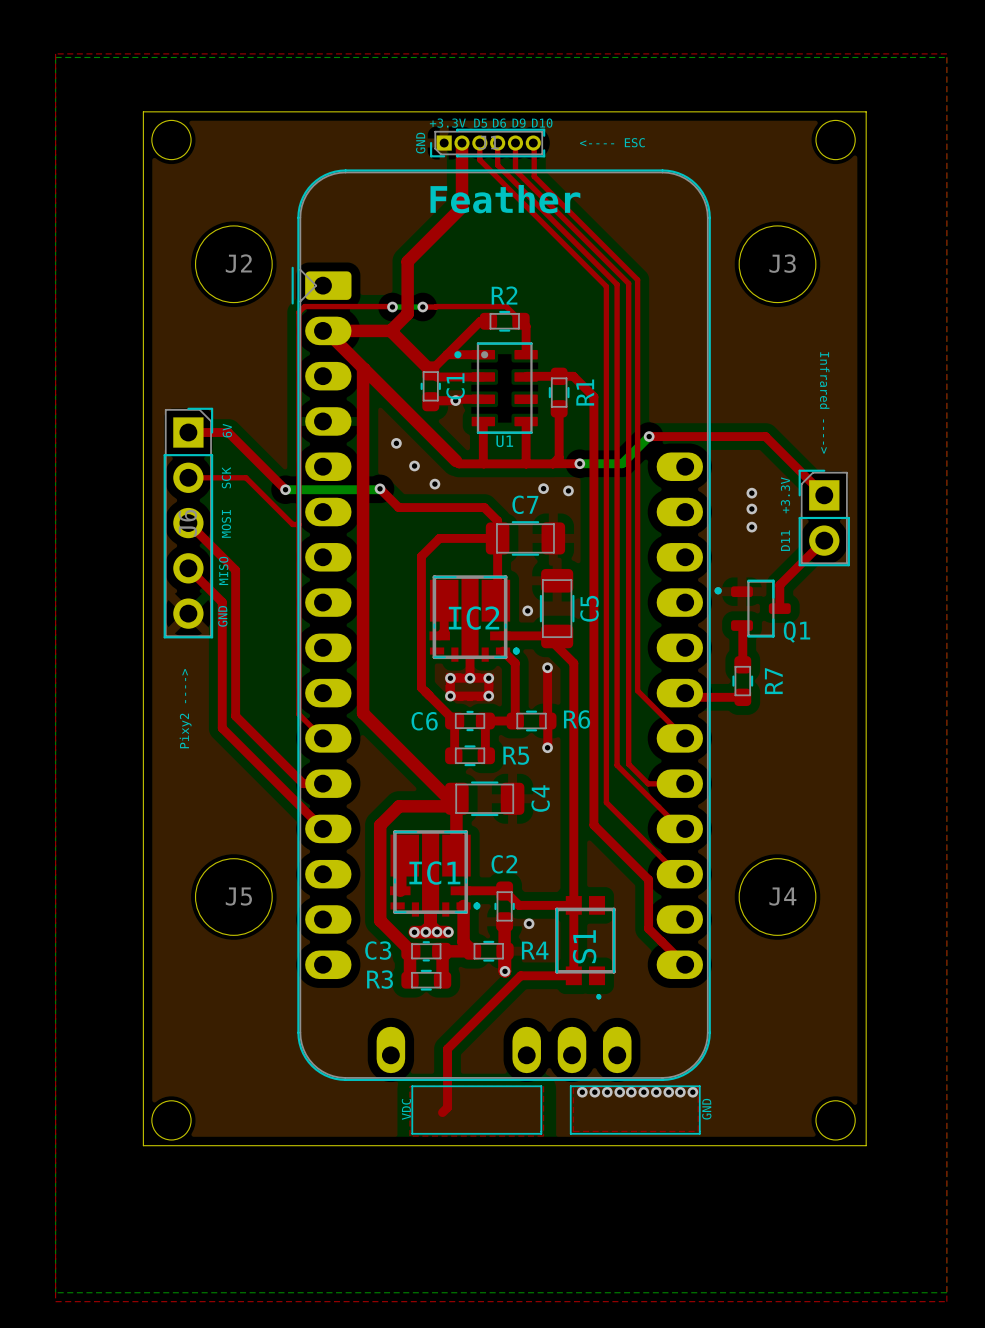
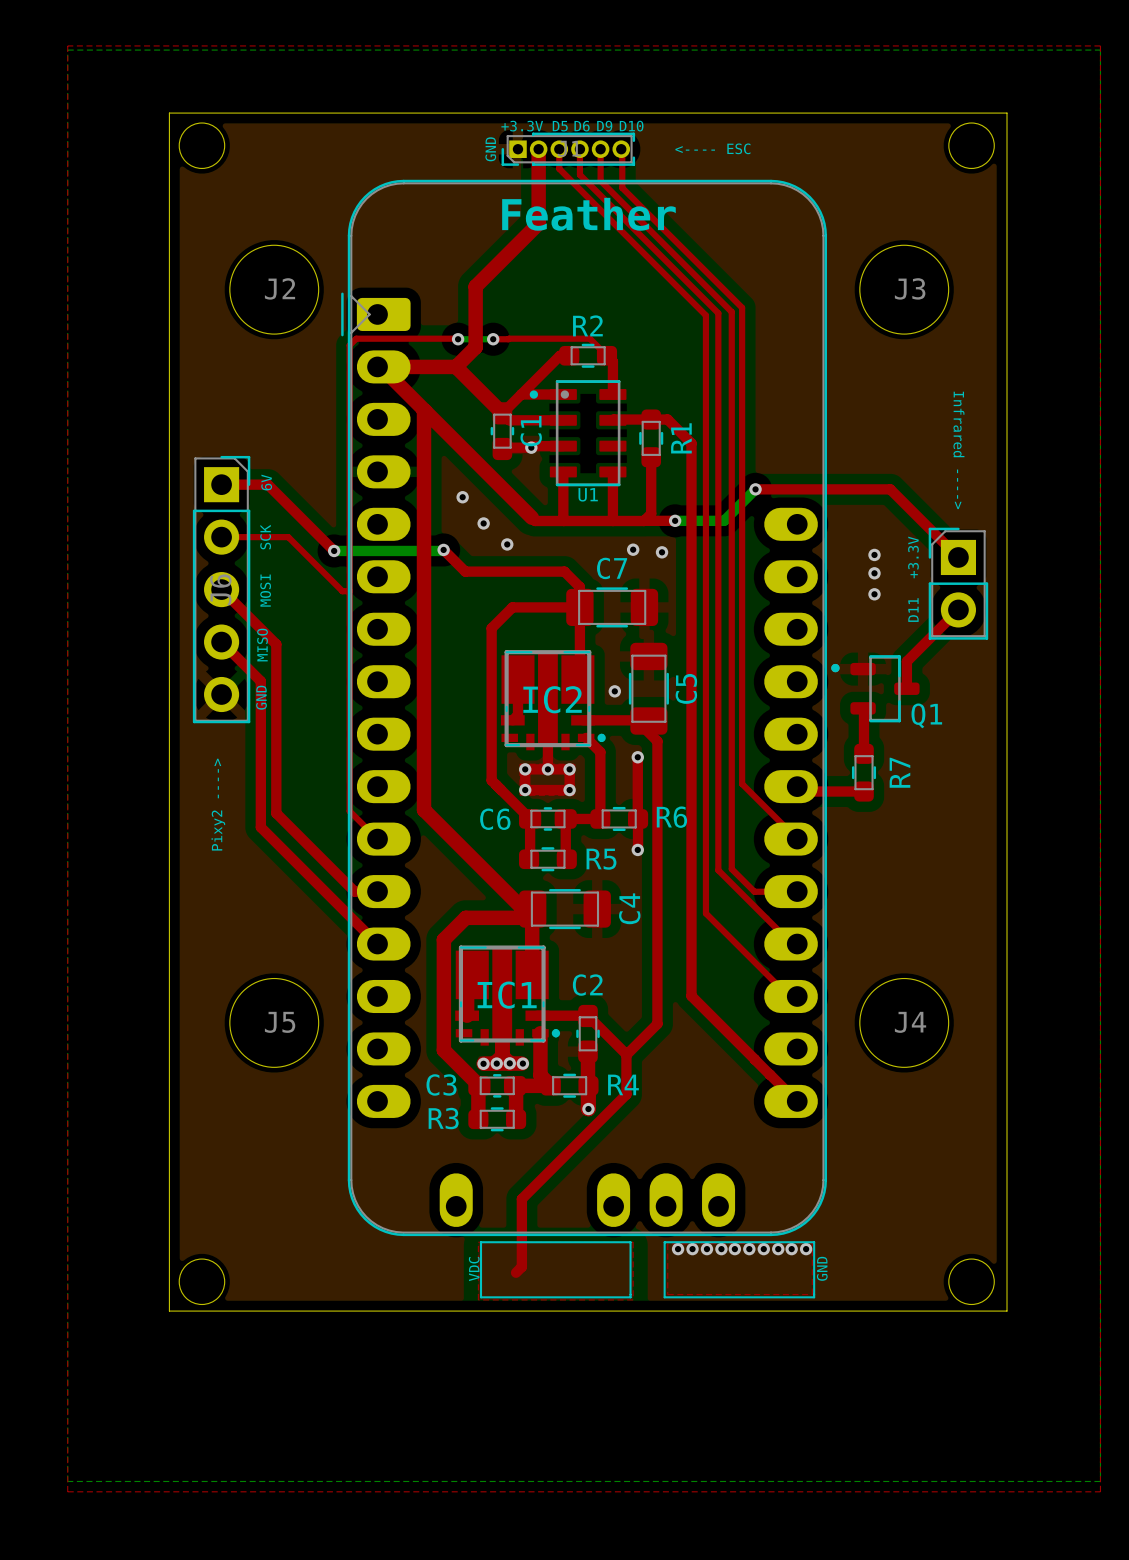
top track: (564, 653) (573, 663) (573, 975) (520, 975) -> (657, 741) (657, 1023) (626, 1054)
top track: (593, 825) (648, 879) (648, 928) -> (691, 939) (691, 996) (754, 1059)
top track: (518, 905) (573, 905) -> (604, 1032) (626, 1054) (626, 1094) (606, 1114)
via: (529, 923) -> none
S1: (585, 947) -> none

